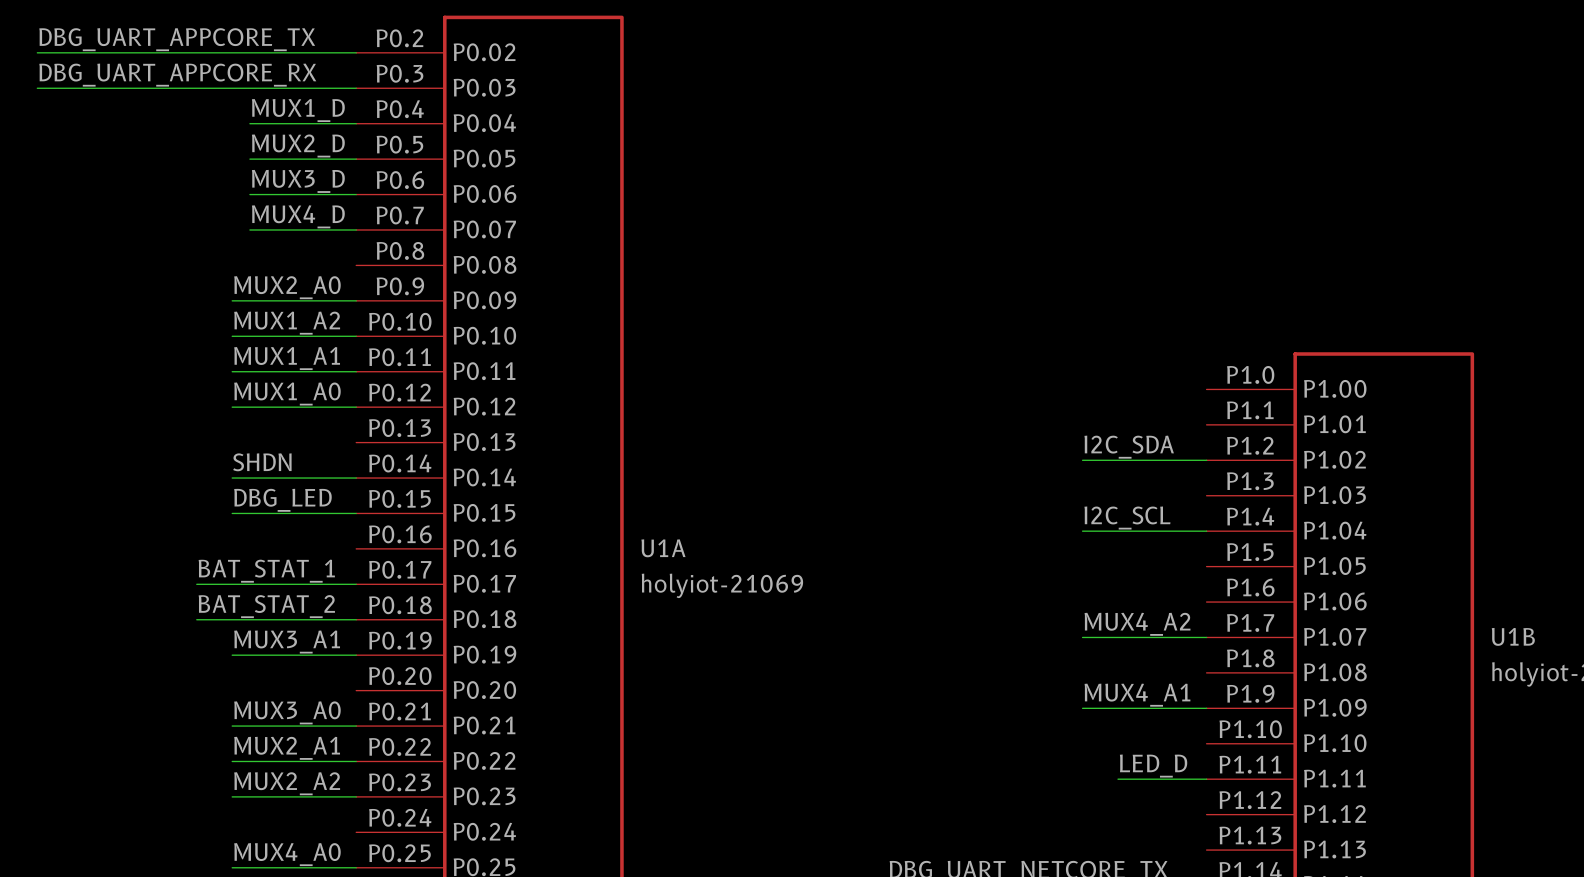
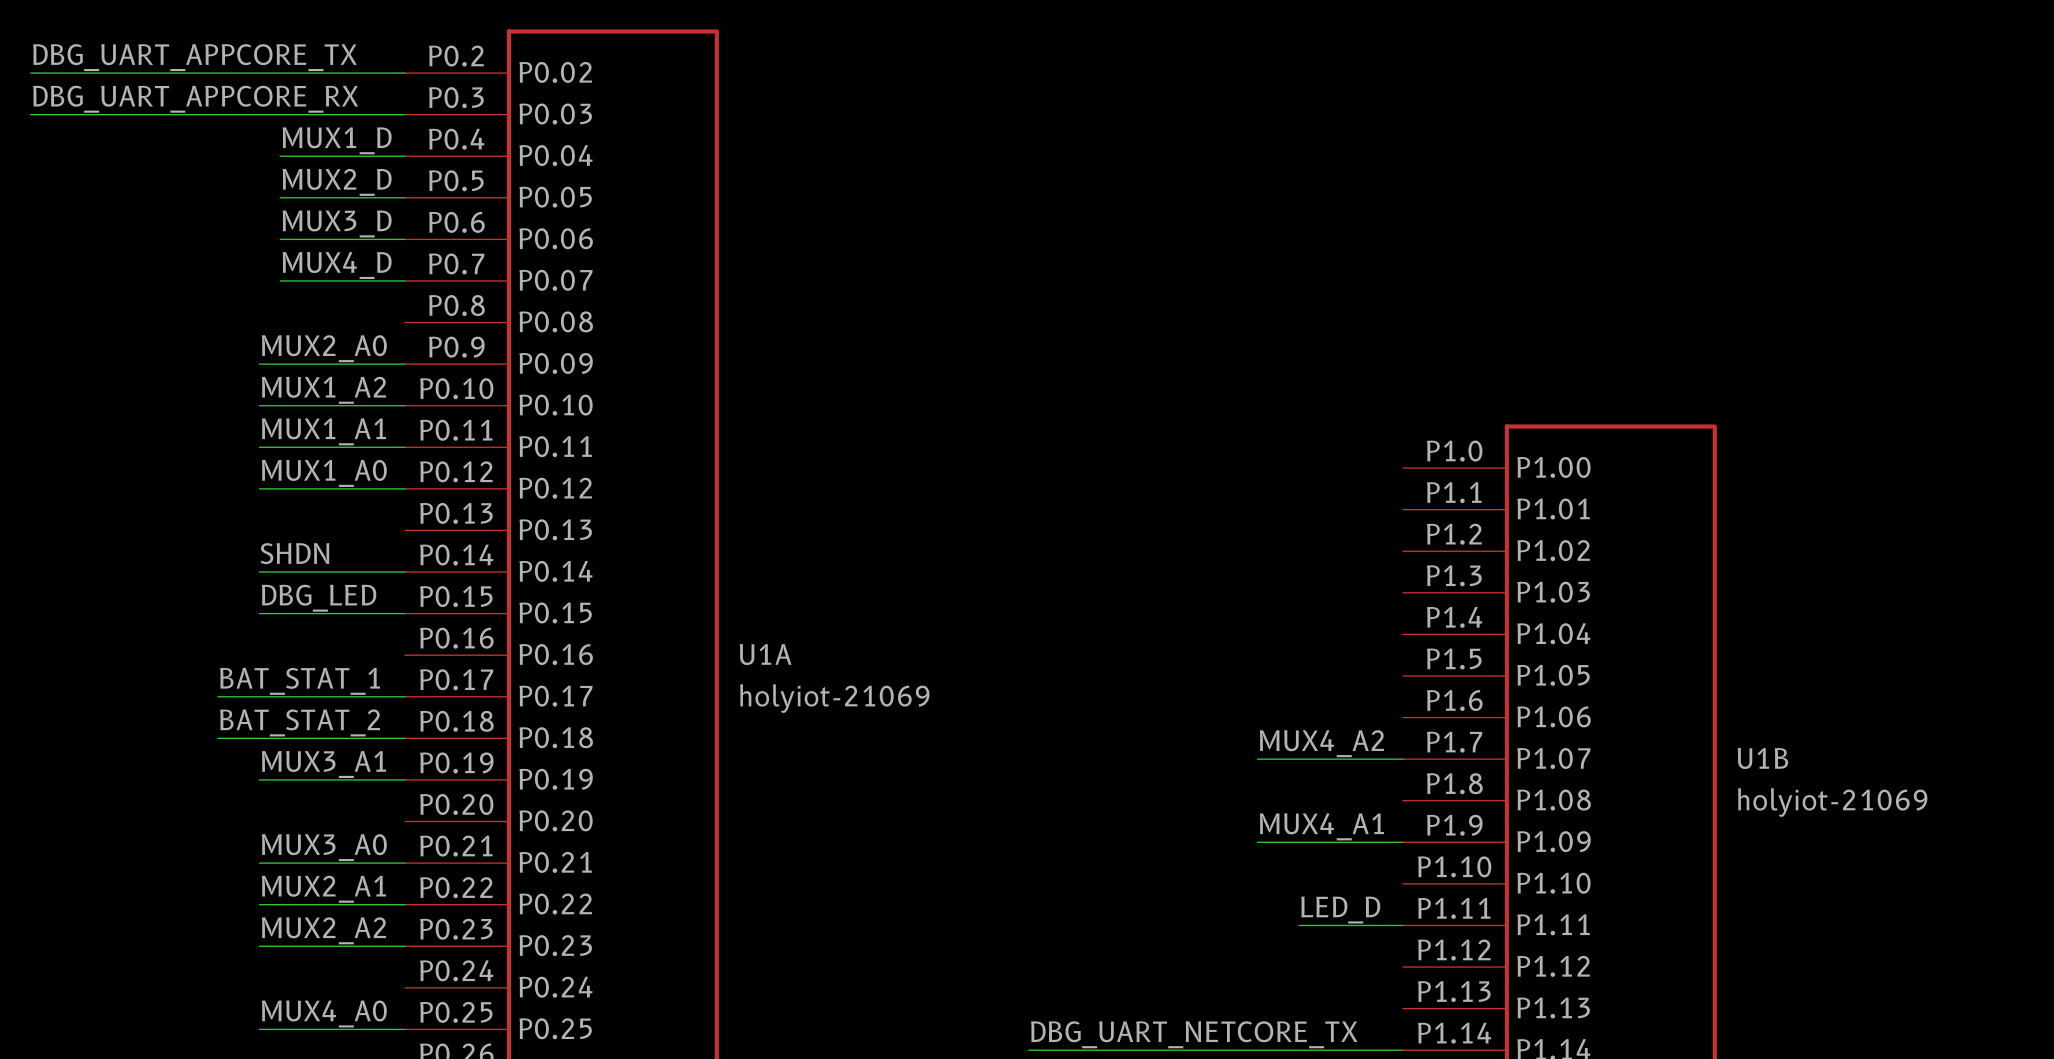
label: I2C_SDA (1129, 447) -> none
wire: (1082, 460) (1206, 460) -> none
label: I2C_SCL (1127, 518) -> none
wire: (1082, 531) (1206, 531) -> none

